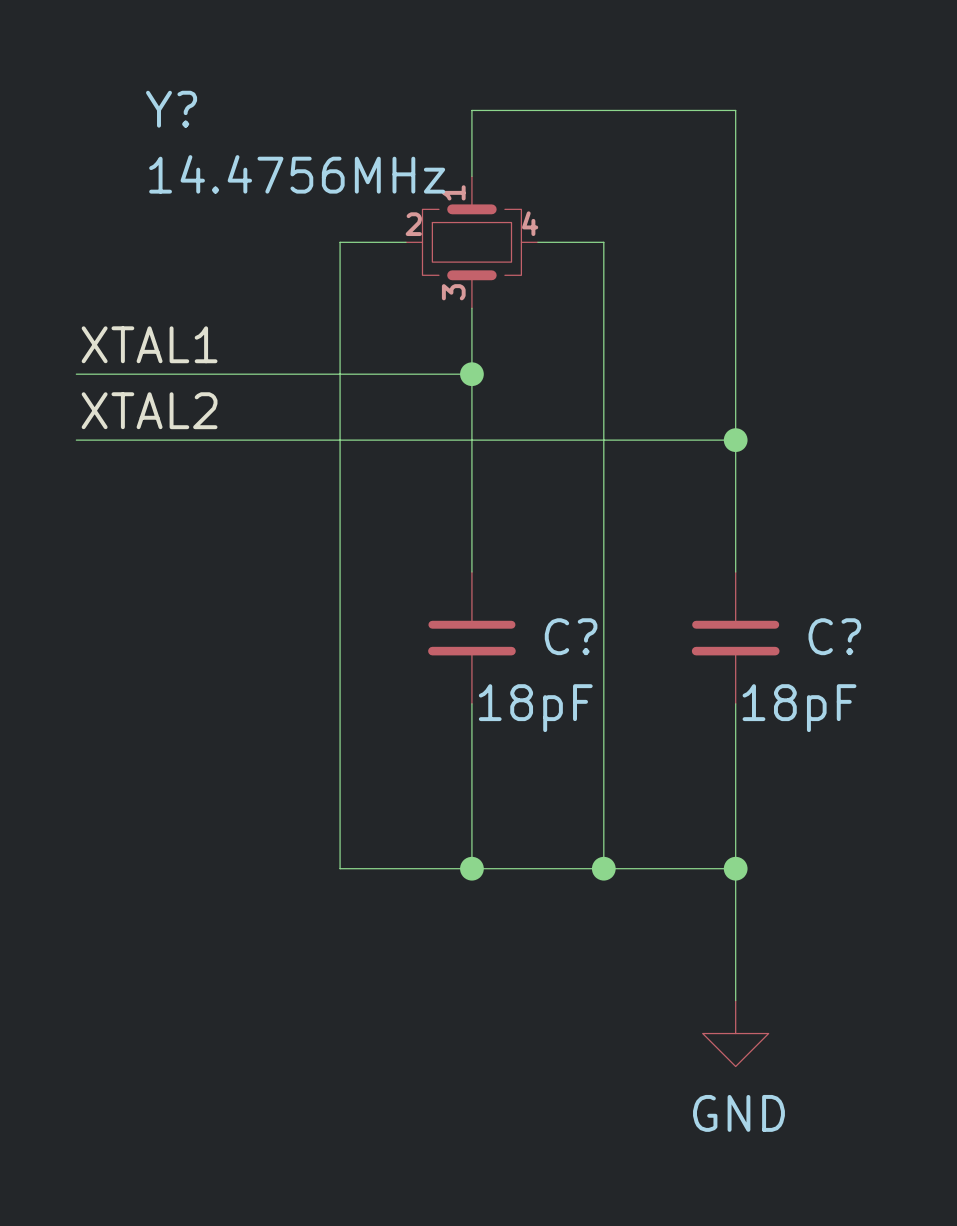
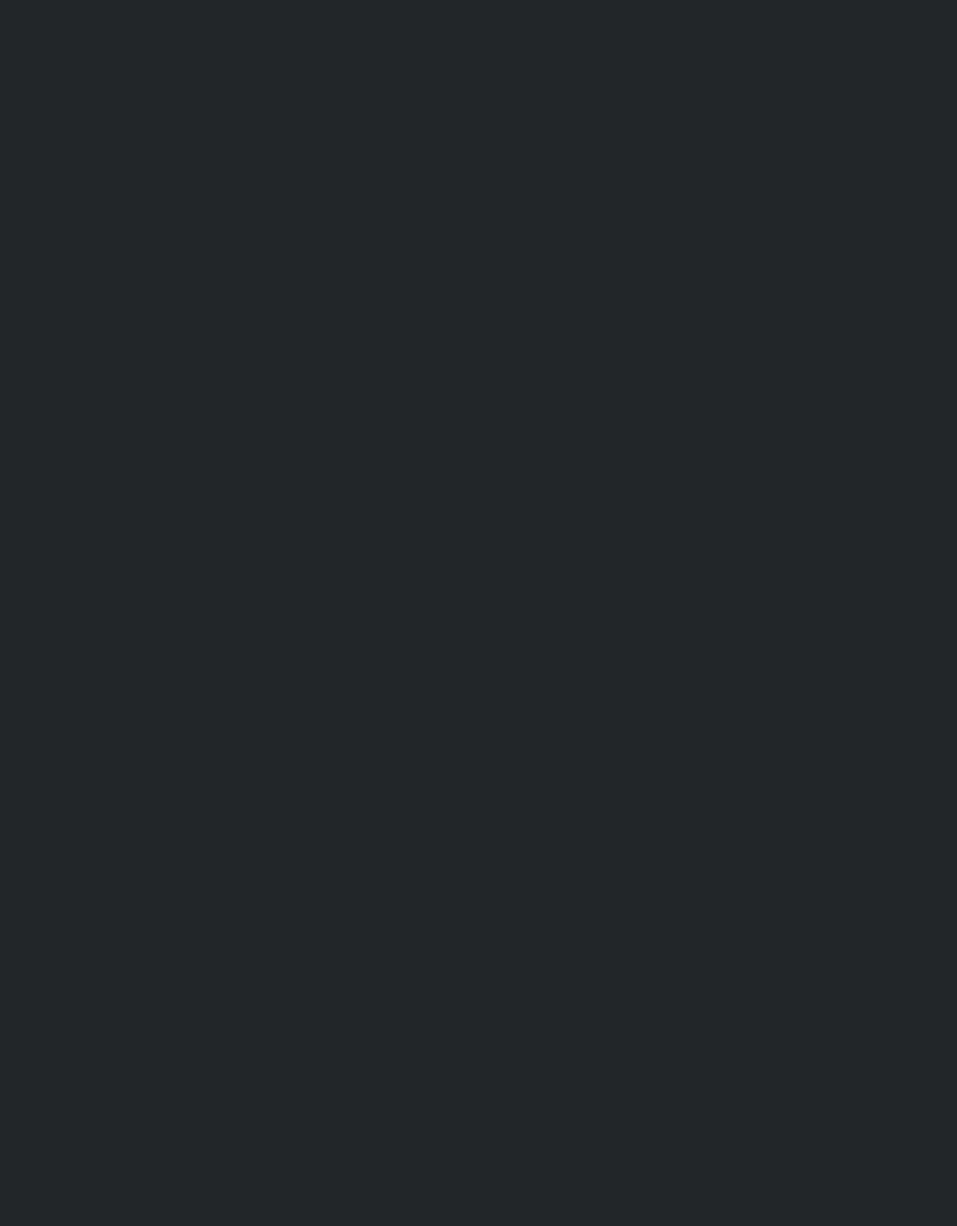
wire: (471, 176) (471, 110) (735, 110) (735, 571) -> none
wire: (406, 242) (340, 242) (340, 868) (735, 868) -> none
Y?: 14.4756MHz (471, 242) -> none
wire: (537, 242) (603, 242) (603, 868) -> none
wire: (471, 308) (471, 571) -> none
label: XTAL1 (149, 344) -> none
wire: (76, 374) (471, 374) -> none
junction: (471, 374) -> none
label: XTAL2 (149, 410) -> none
wire: (76, 440) (735, 440) -> none
junction: (735, 440) -> none
C?: 18pF (471, 637) -> none
C?: 18pF (735, 637) -> none
wire: (471, 703) (471, 868) -> none
wire: (735, 703) (735, 1000) -> none
junction: (471, 868) -> none
junction: (603, 868) -> none
junction: (735, 868) -> none
power symbol: GND (735, 1033) -> none

